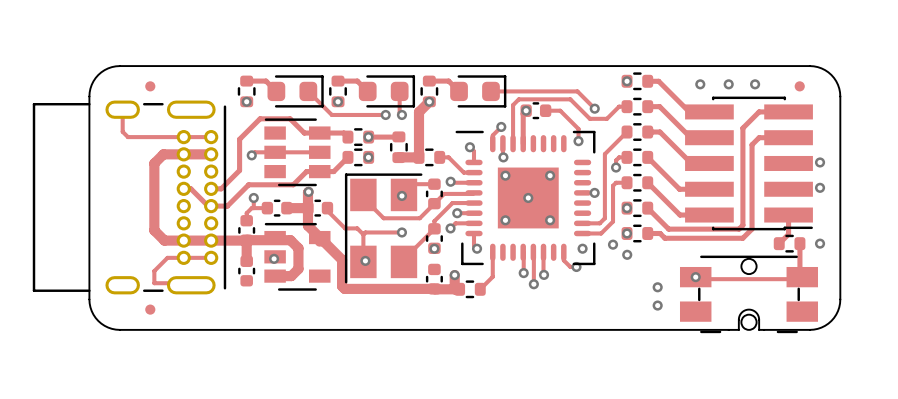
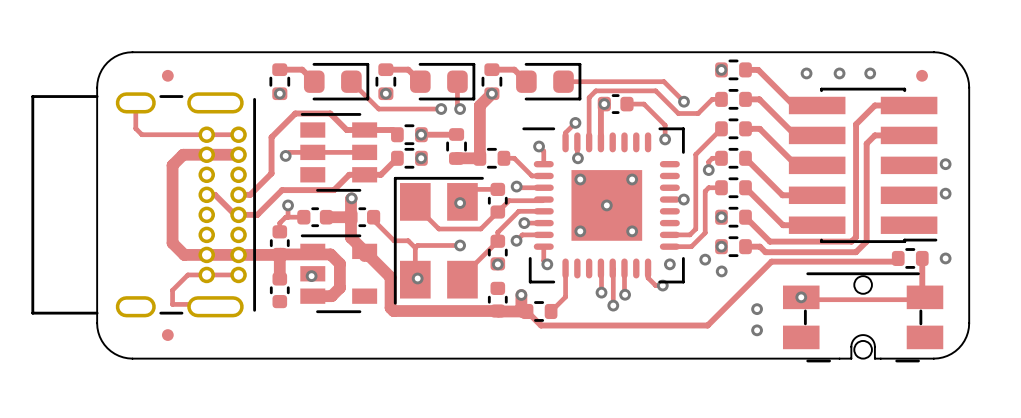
track: (788, 215) (788, 234) (779, 243) -> (527, 311) (541, 325) (707, 325) (771, 261) (895, 261) (898, 258)

